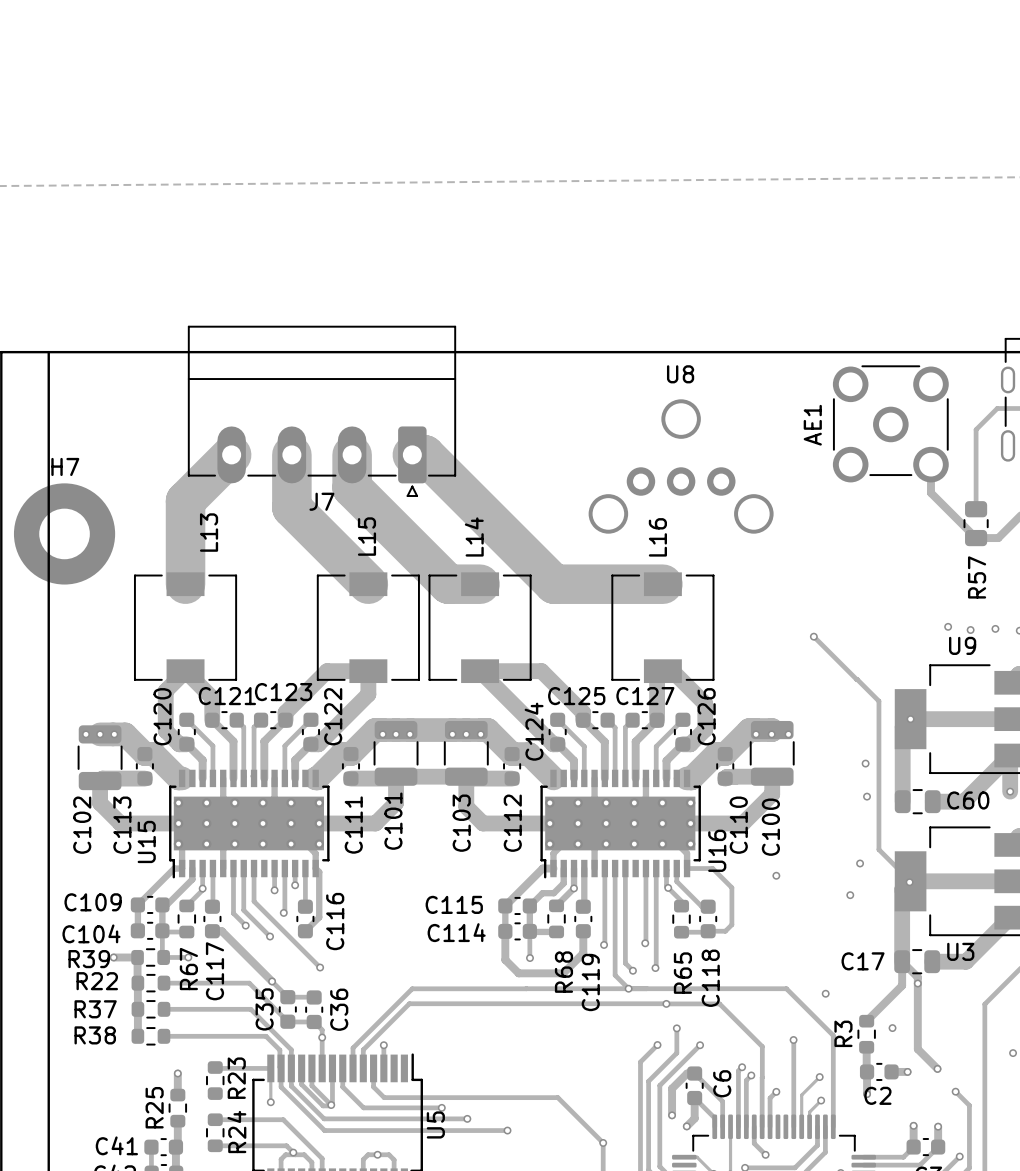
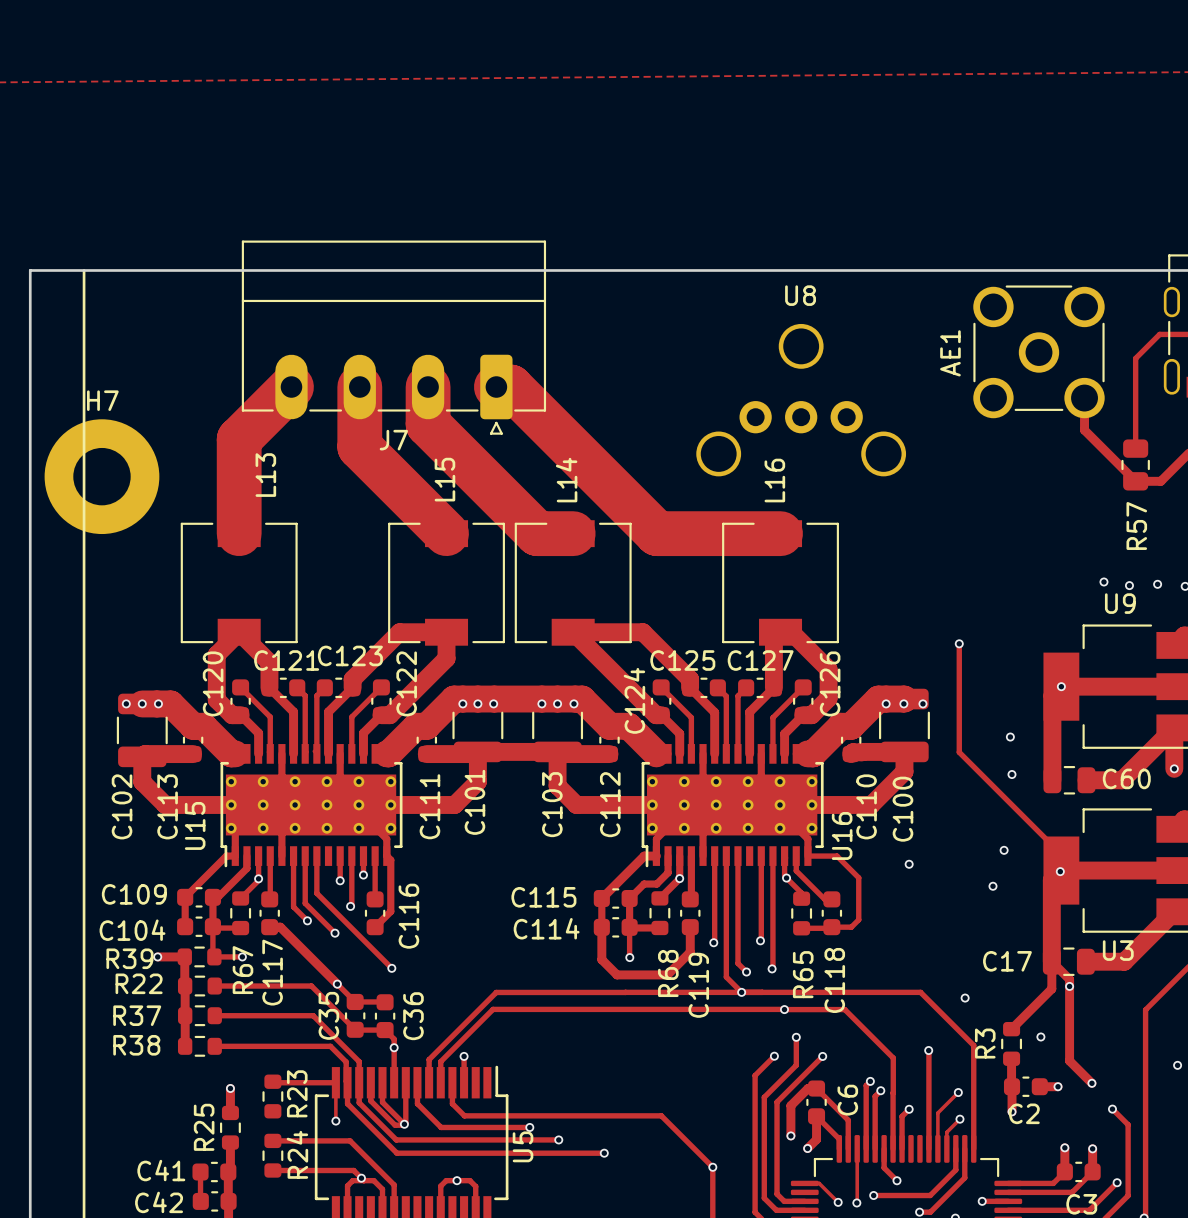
track: (813, 636) (878, 701) (878, 849) (910, 881) -> (959, 643) (959, 752) (1061, 854) (1061, 870)
via position: (813, 636) -> (959, 643)

